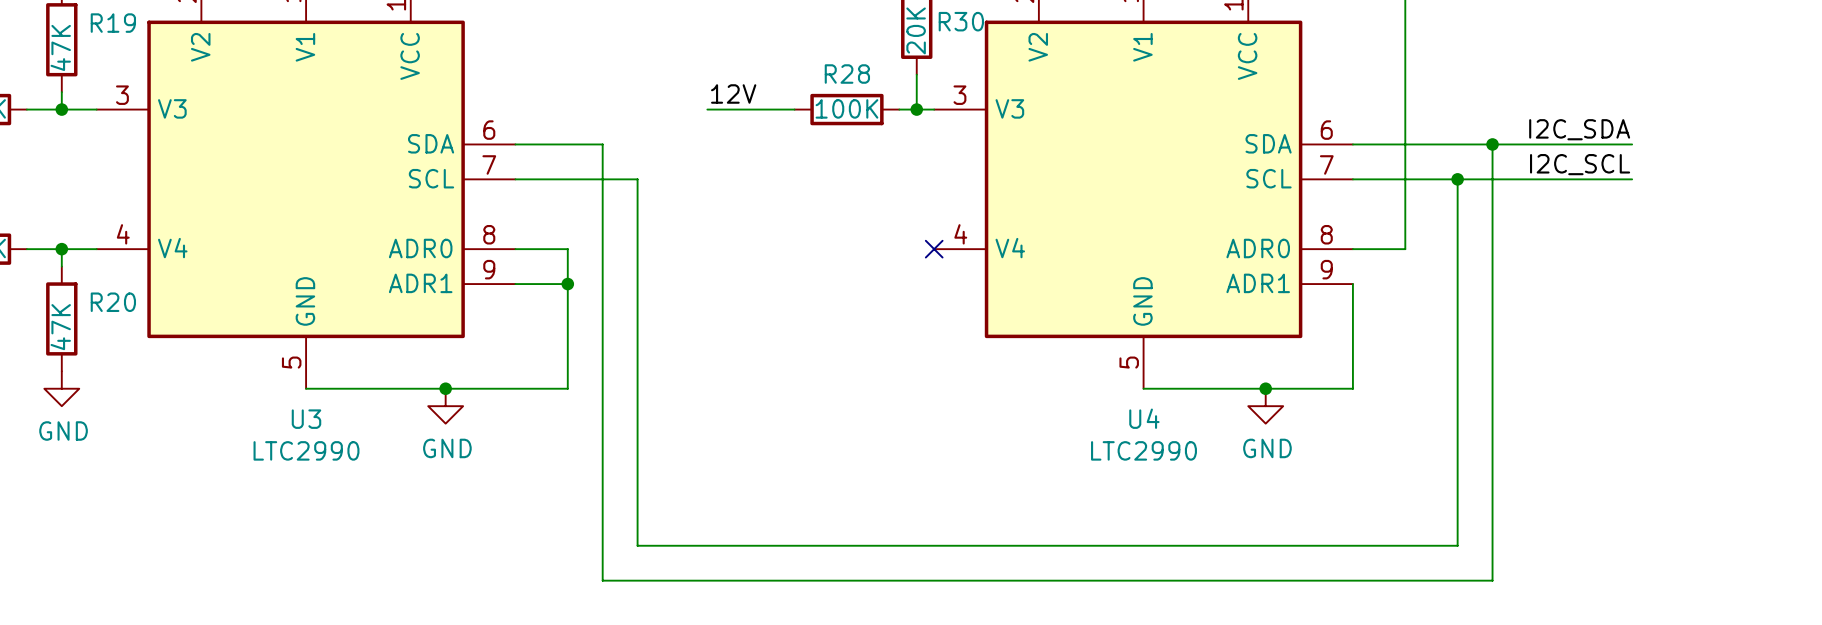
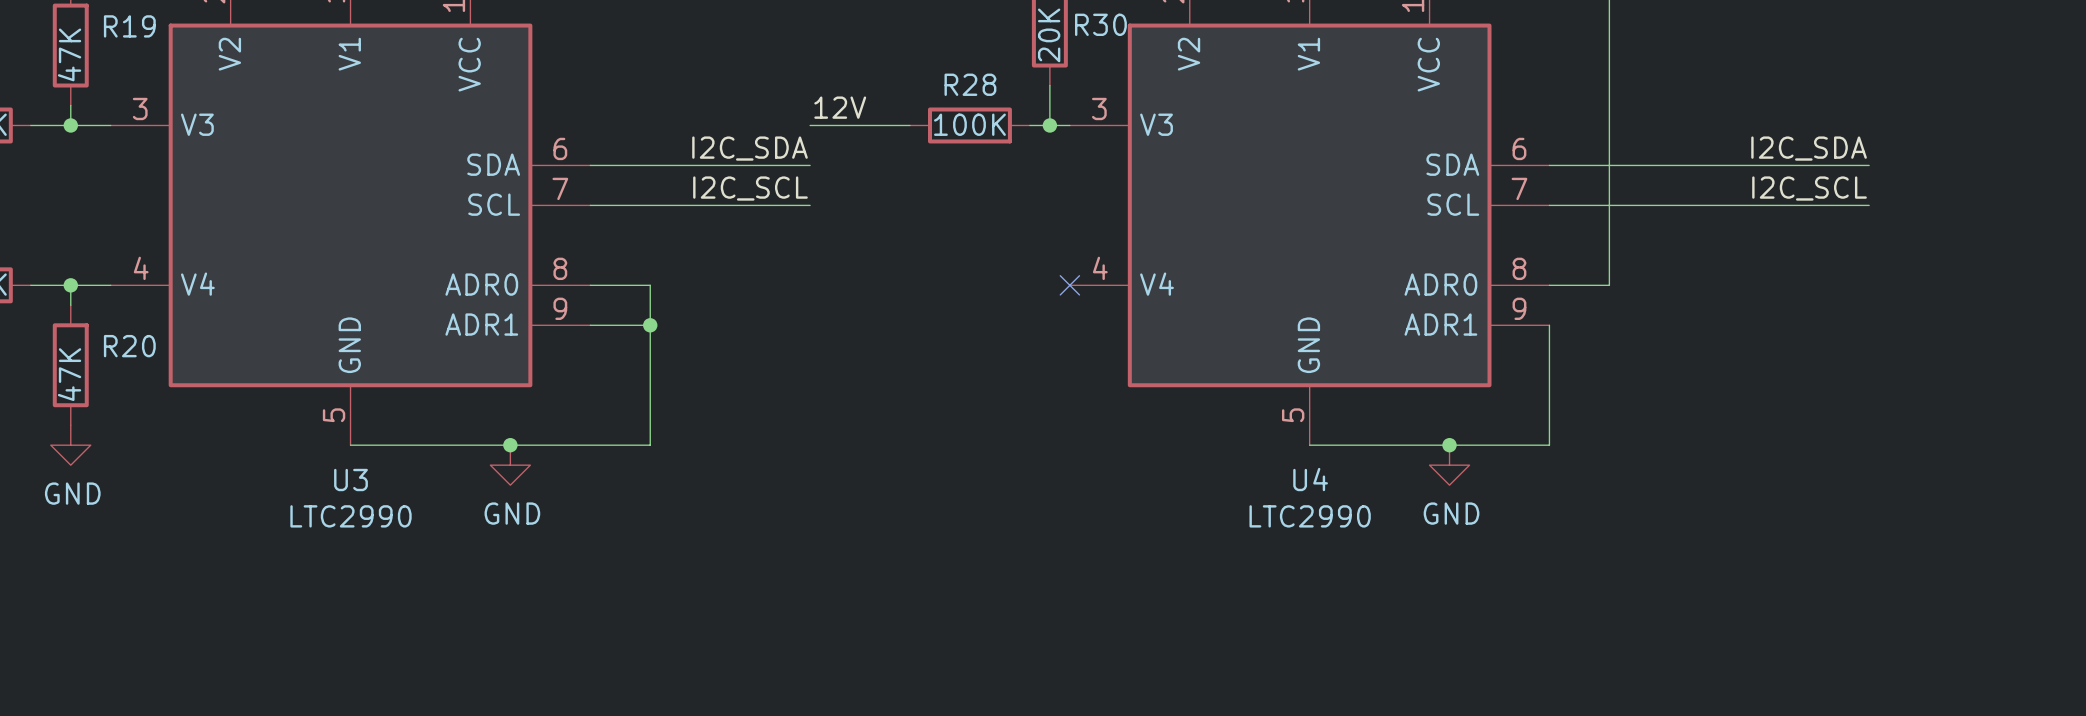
label: none -> I2C_SDA (750, 148)
wire: (602, 144) (602, 580) (1492, 580) (1492, 144) -> (690, 165) (810, 165)
junction: (1492, 144) -> none
label: none -> I2C_SCL (750, 188)
wire: (637, 179) (637, 545) (1457, 545) (1457, 179) -> (730, 205) (810, 205)
junction: (1457, 179) -> none

